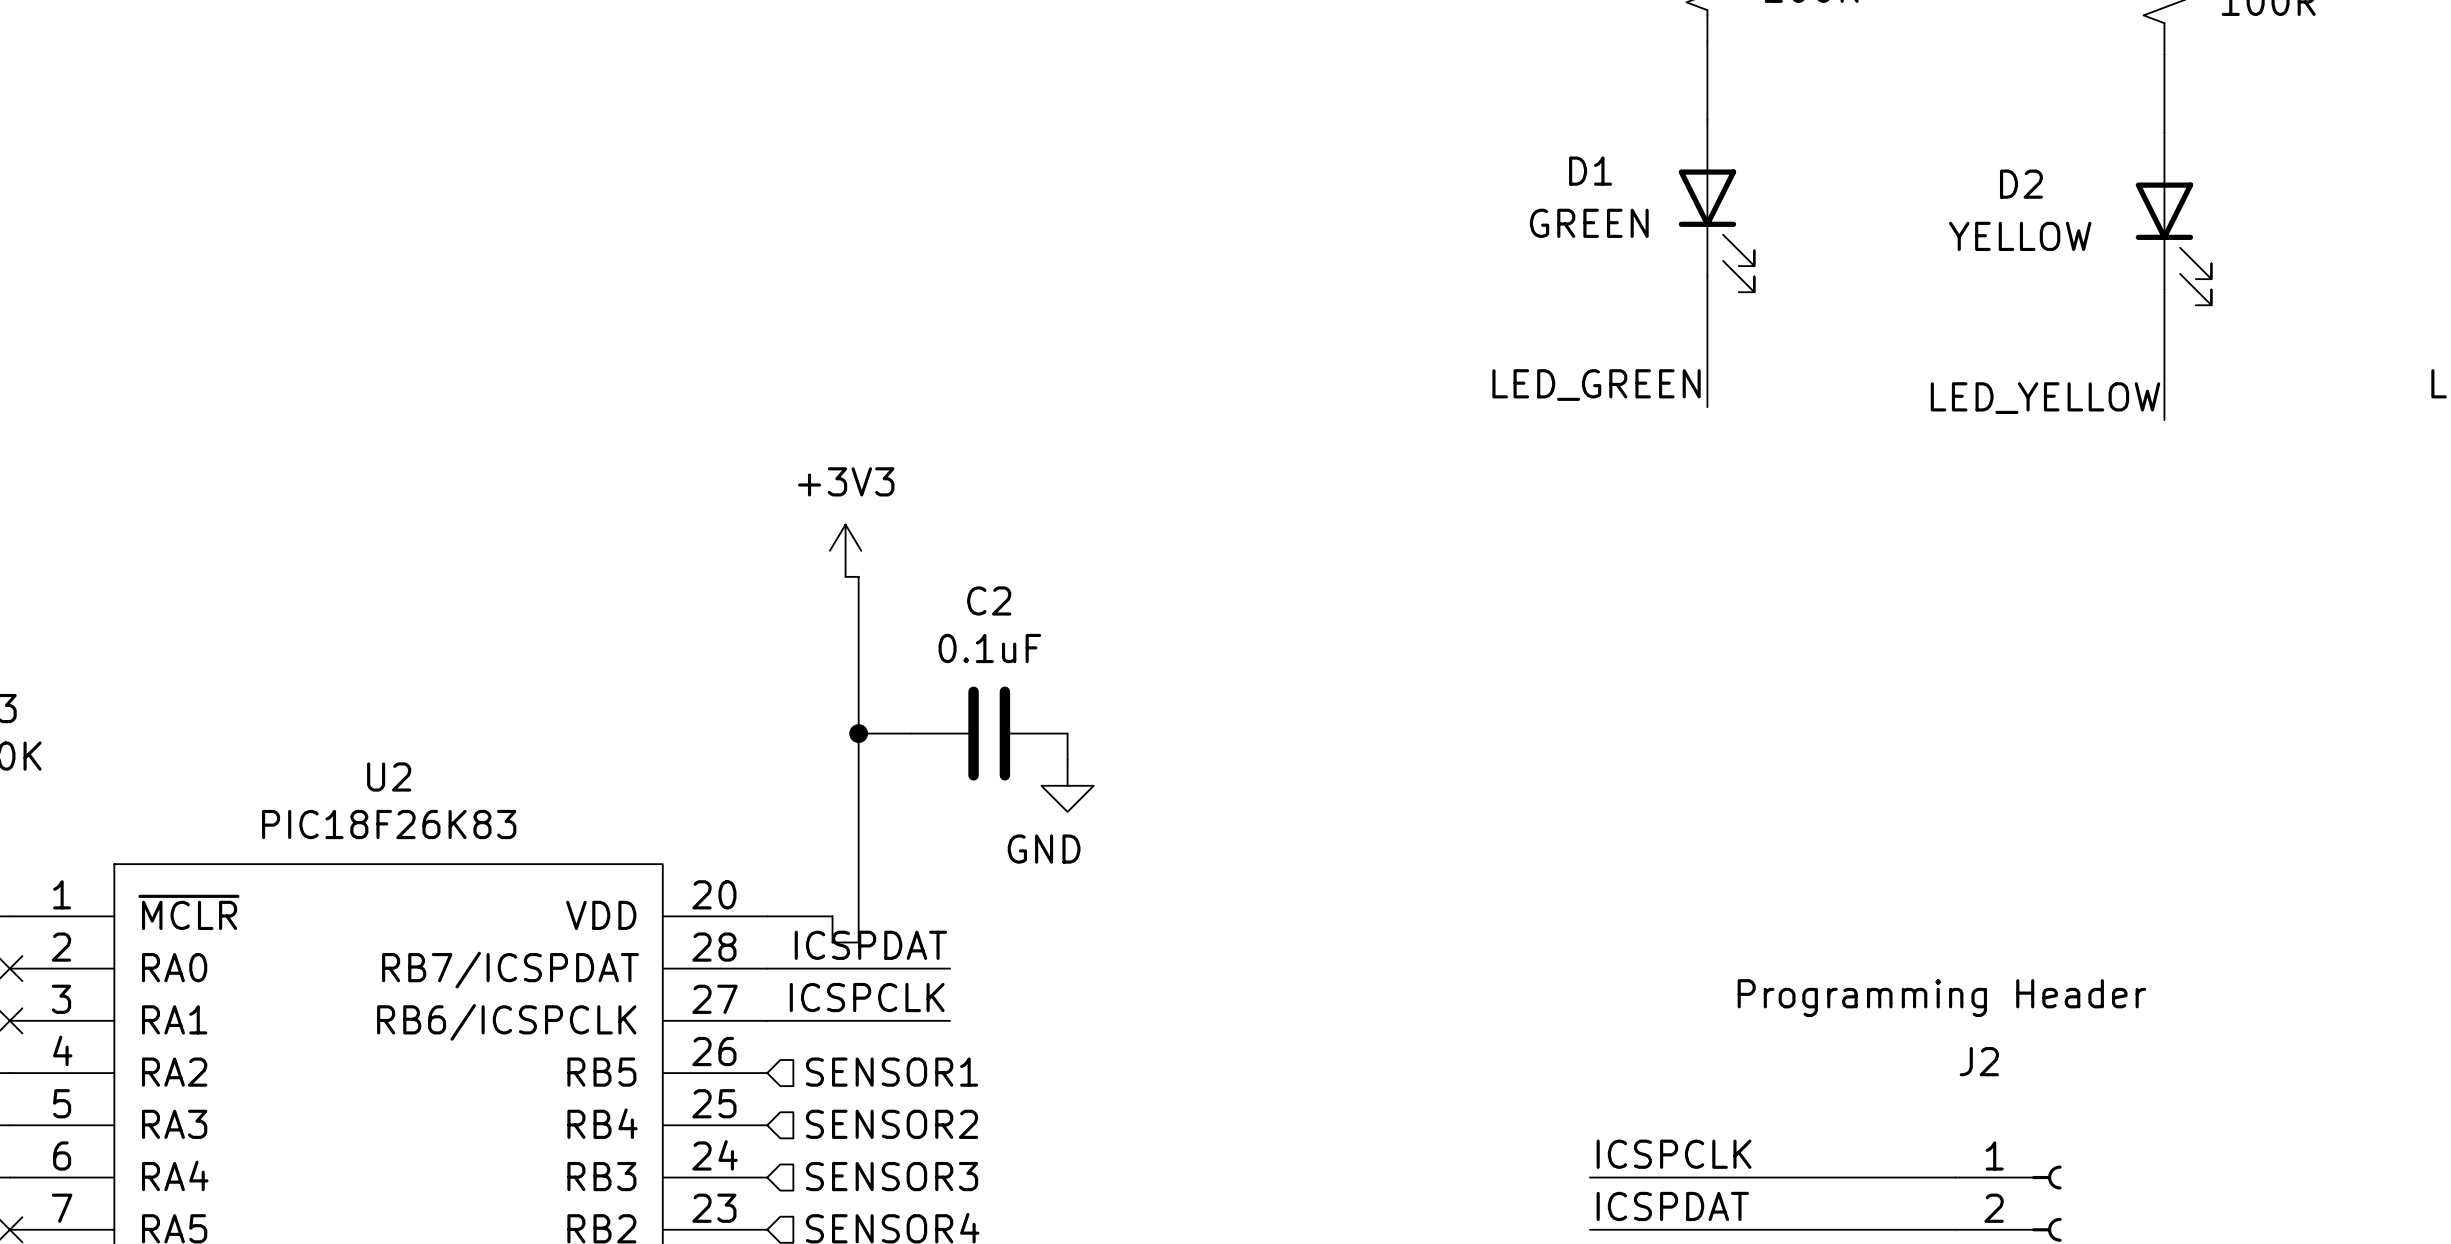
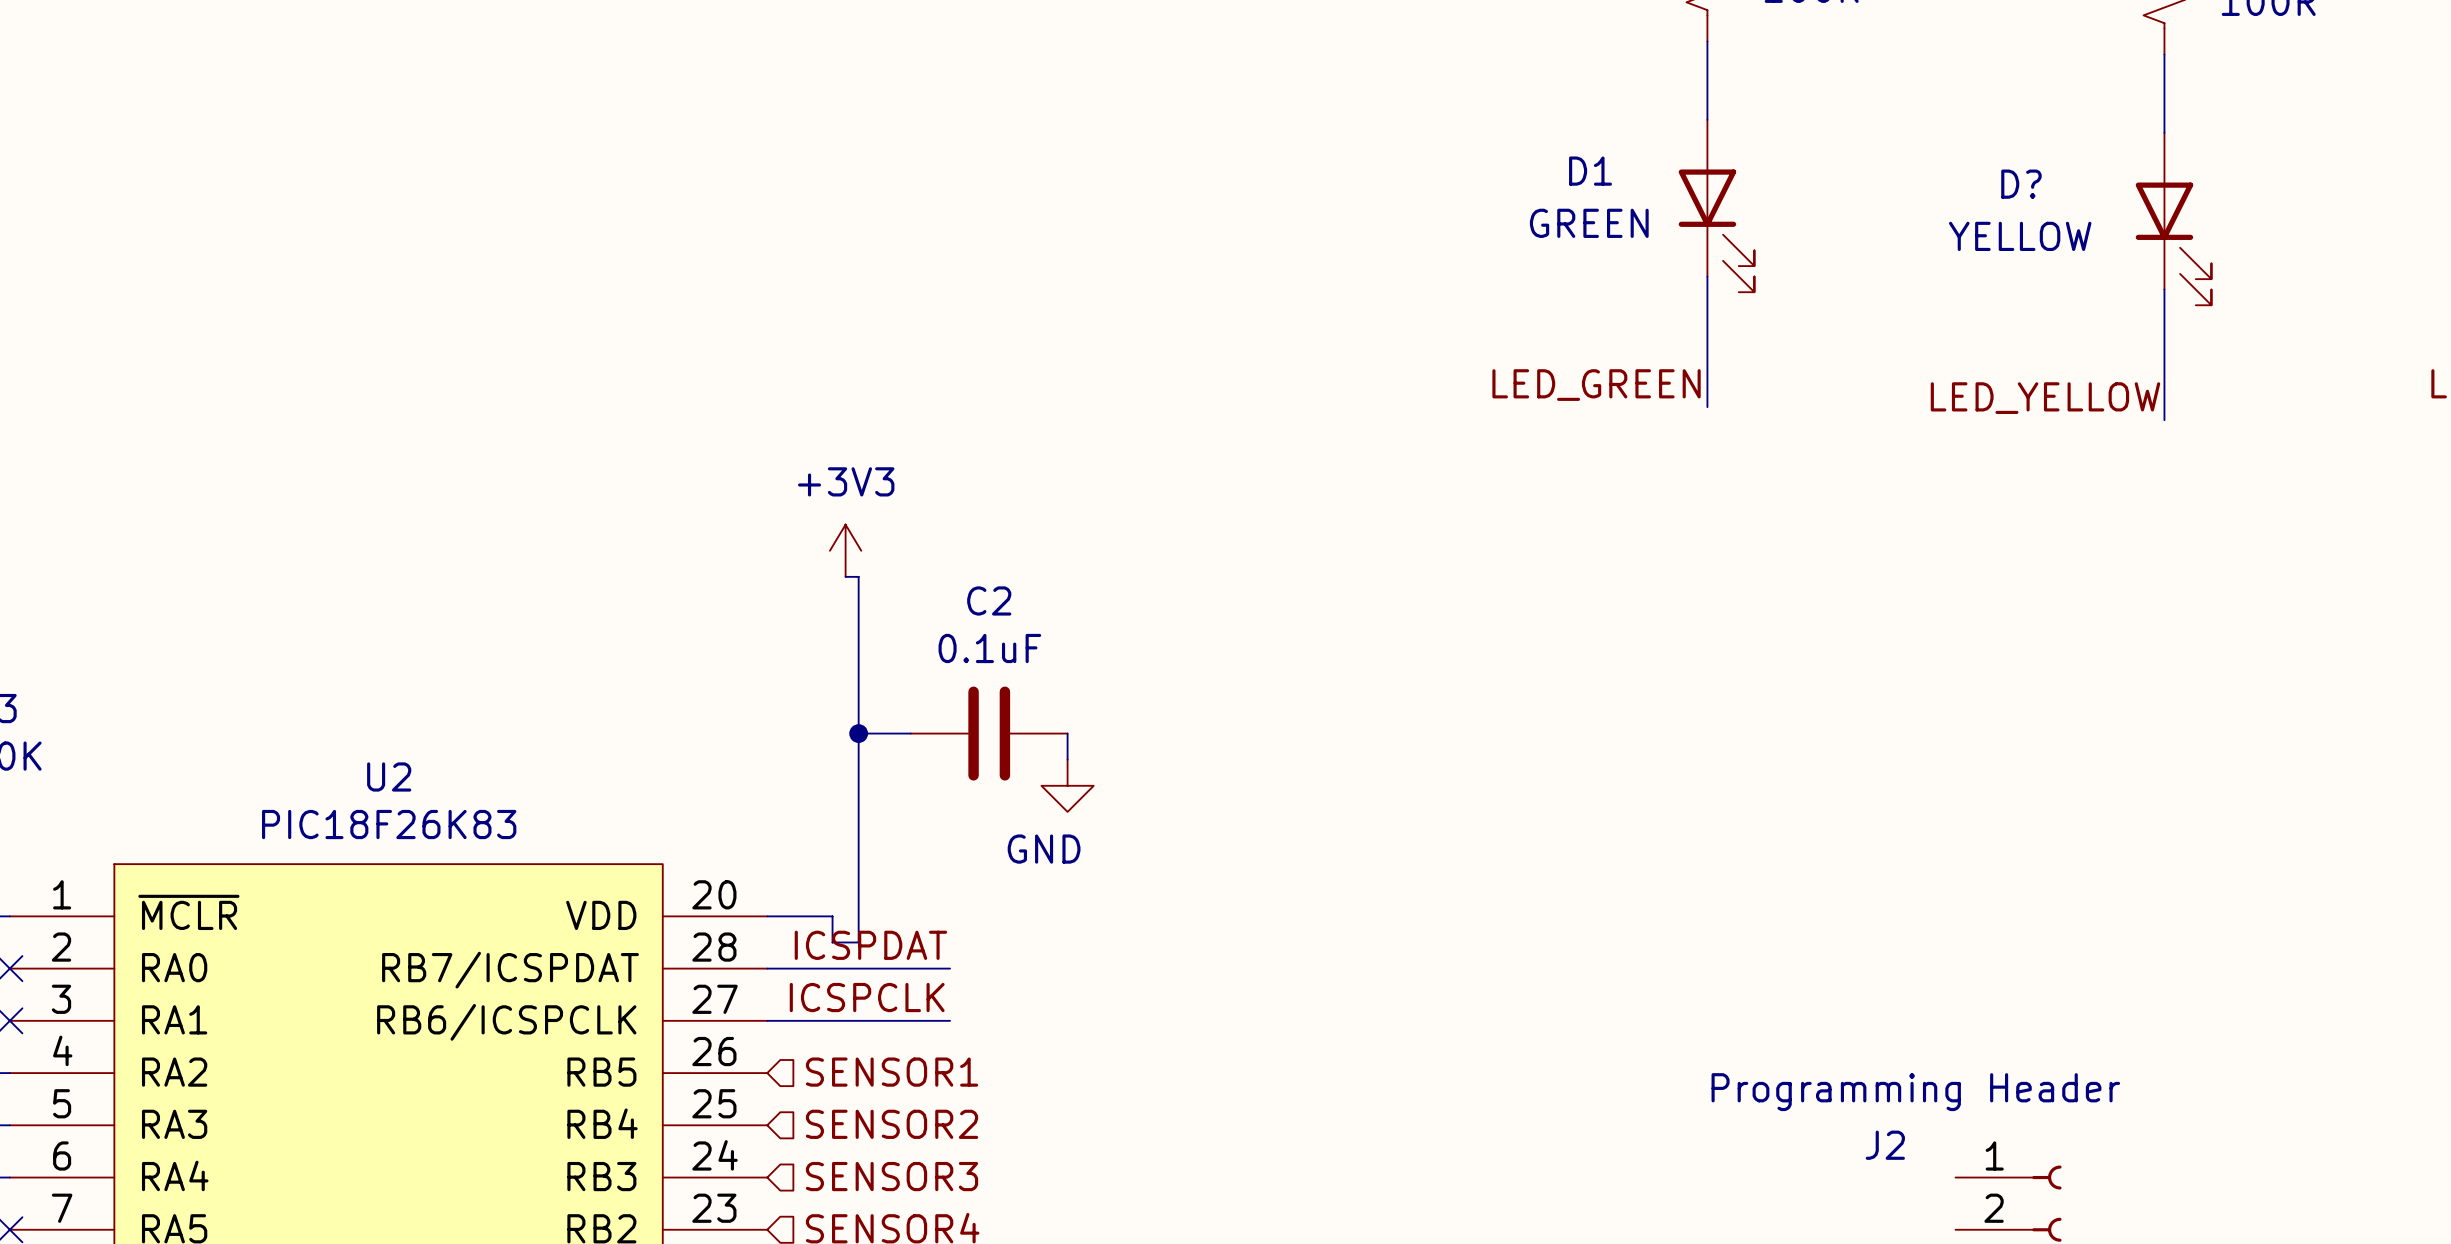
D2 name: D2 (2021, 184) -> D? (2021, 184)
J2 value position: Programming Header (1941, 998) -> Programming Header (1915, 1092)
J2 name position: J2 (1979, 1061) -> J2 (1885, 1145)
label: ICSPCLK (1674, 1154) -> none
wire: (1589, 1177) (1955, 1177) -> none
label: ICSPDAT (1672, 1206) -> none
wire: (1589, 1229) (1955, 1229) -> none

